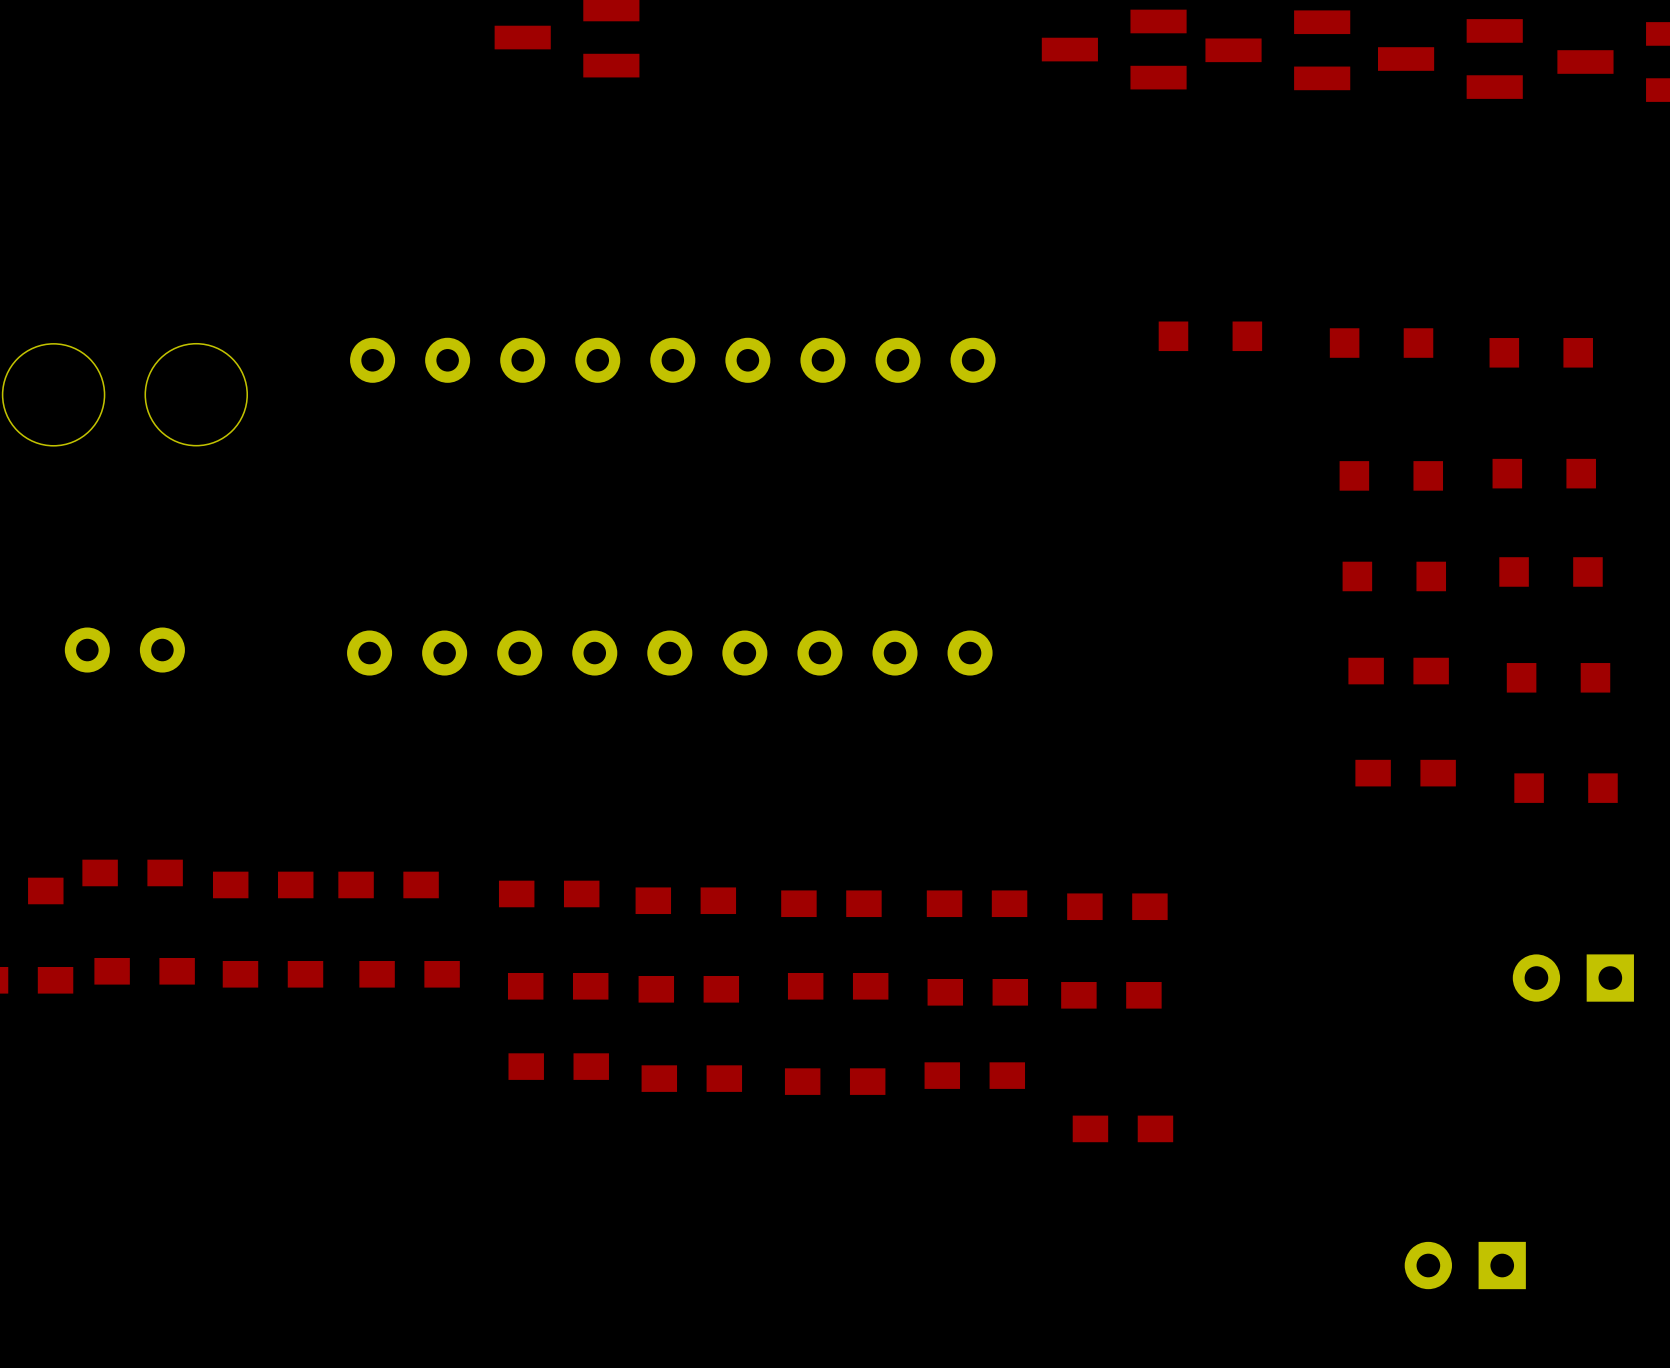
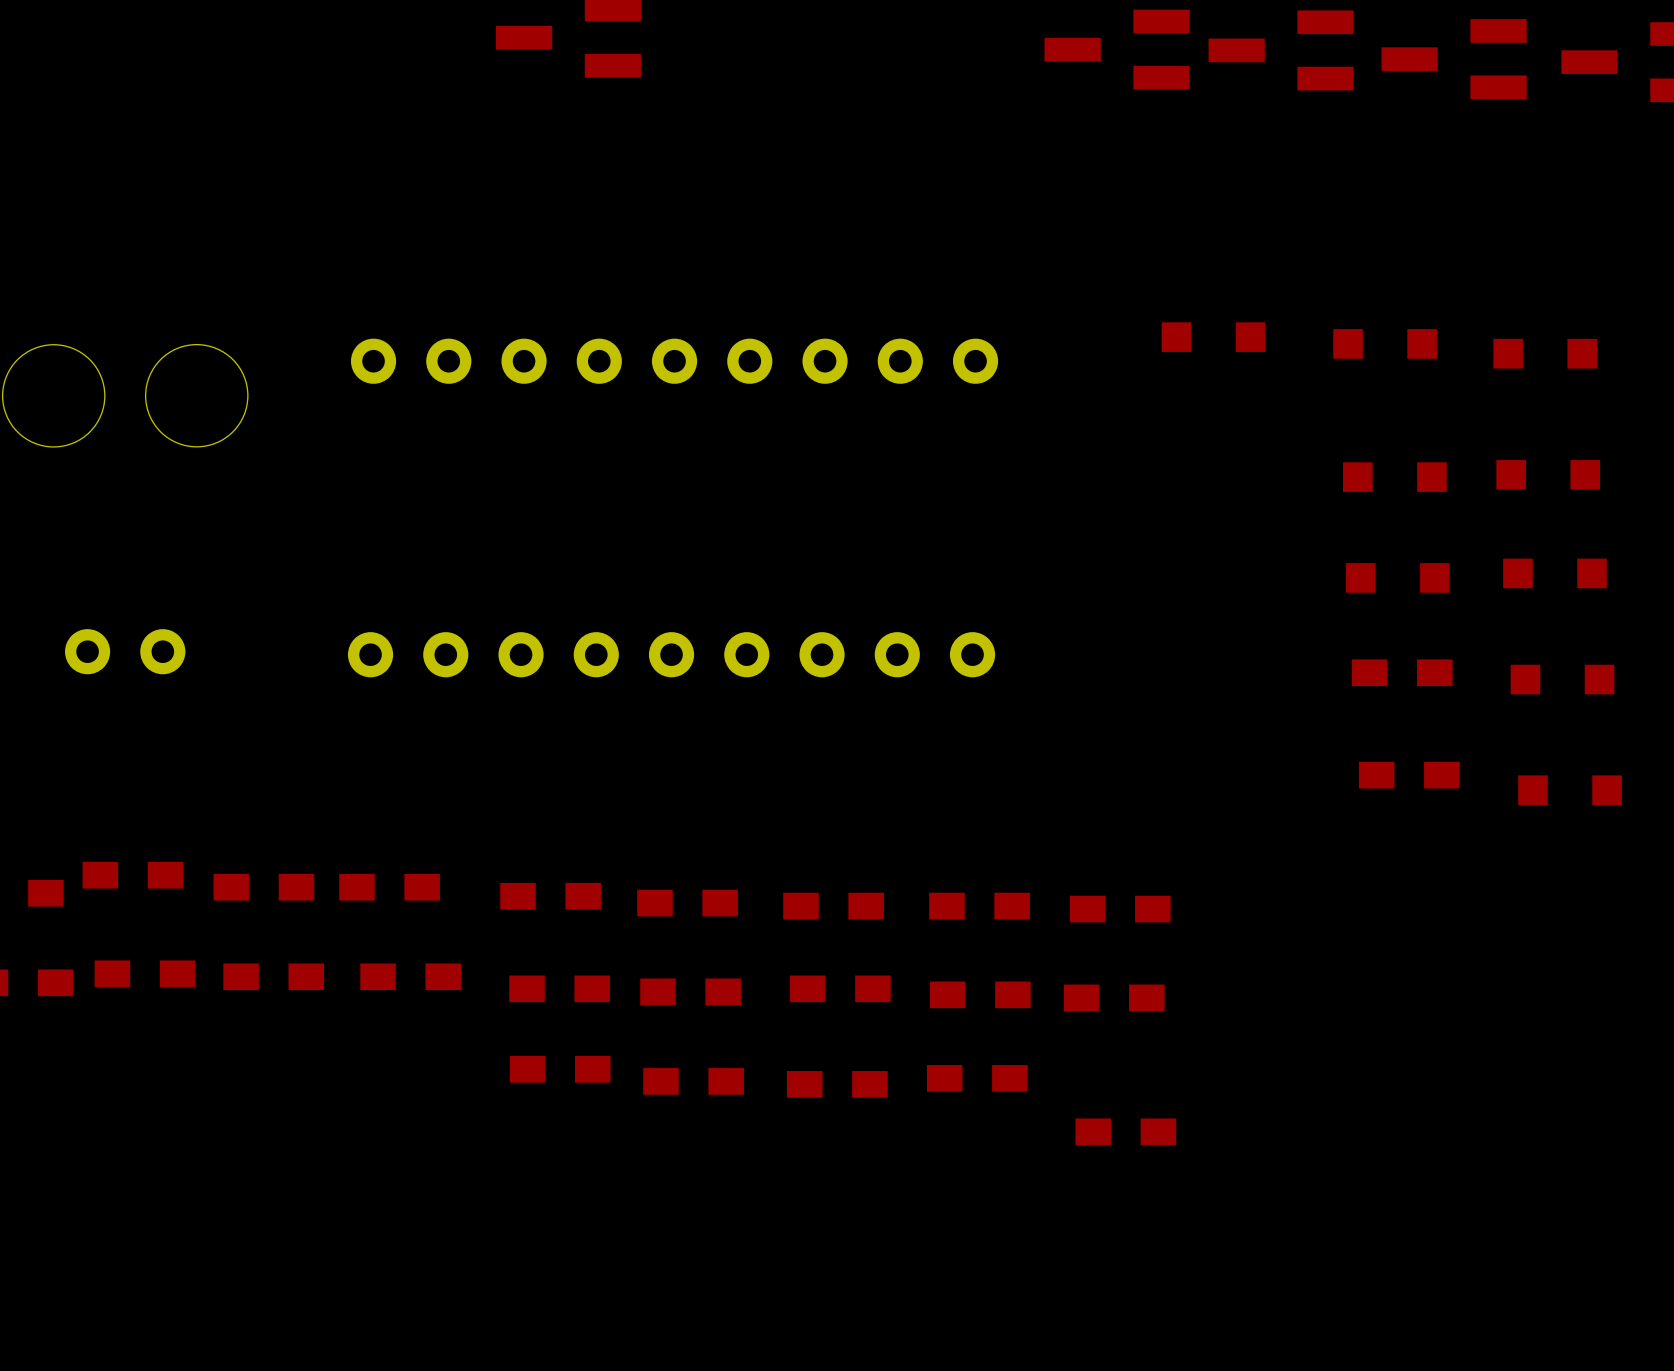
part: (1573, 978) -> none
part: (1465, 1265) -> none

